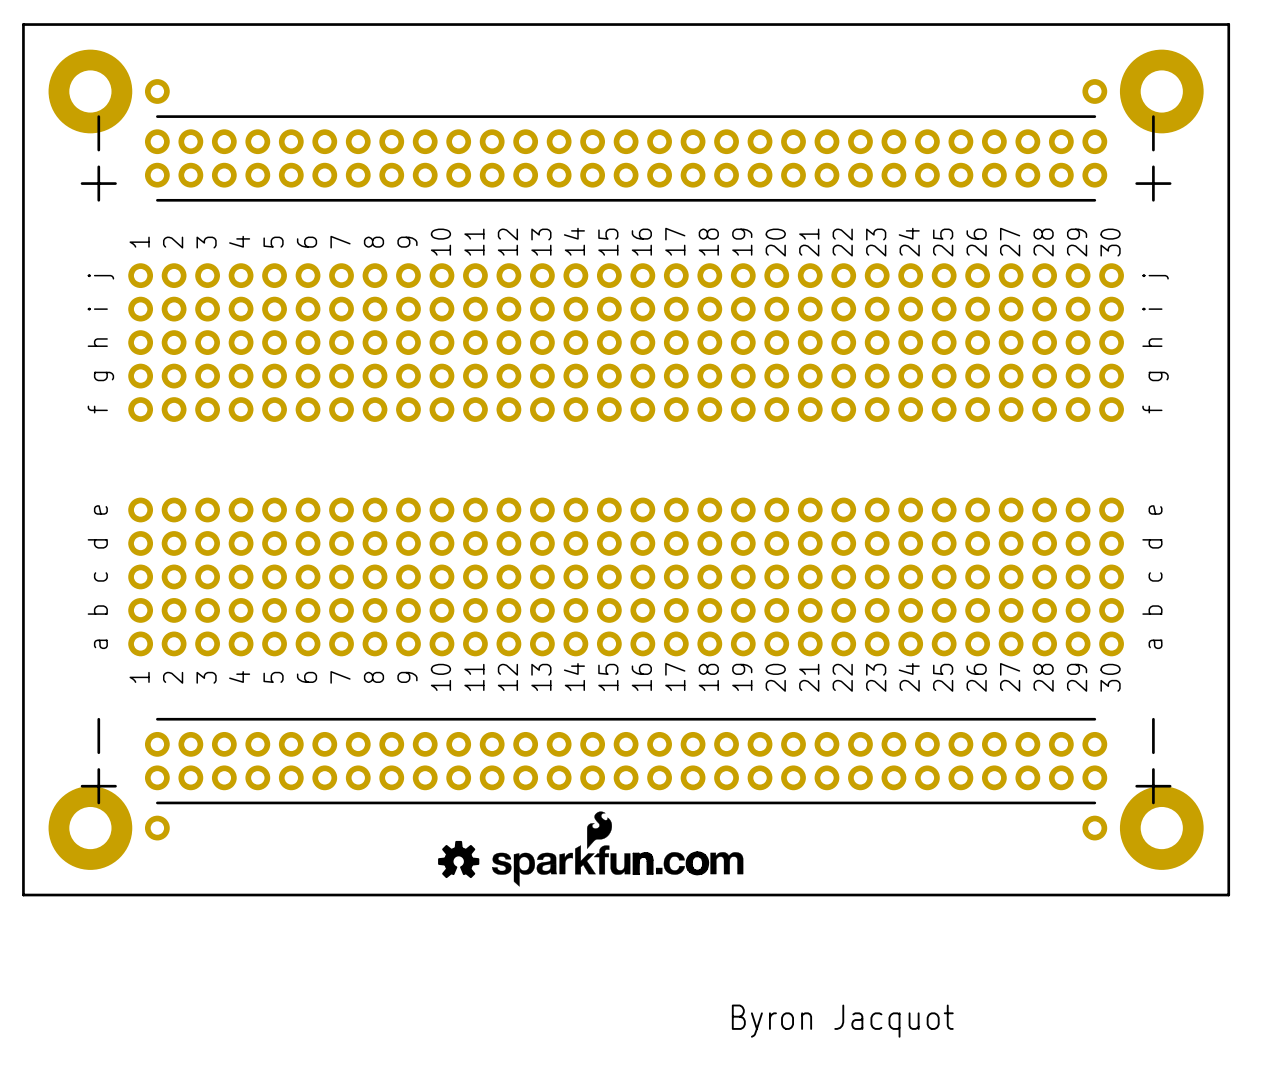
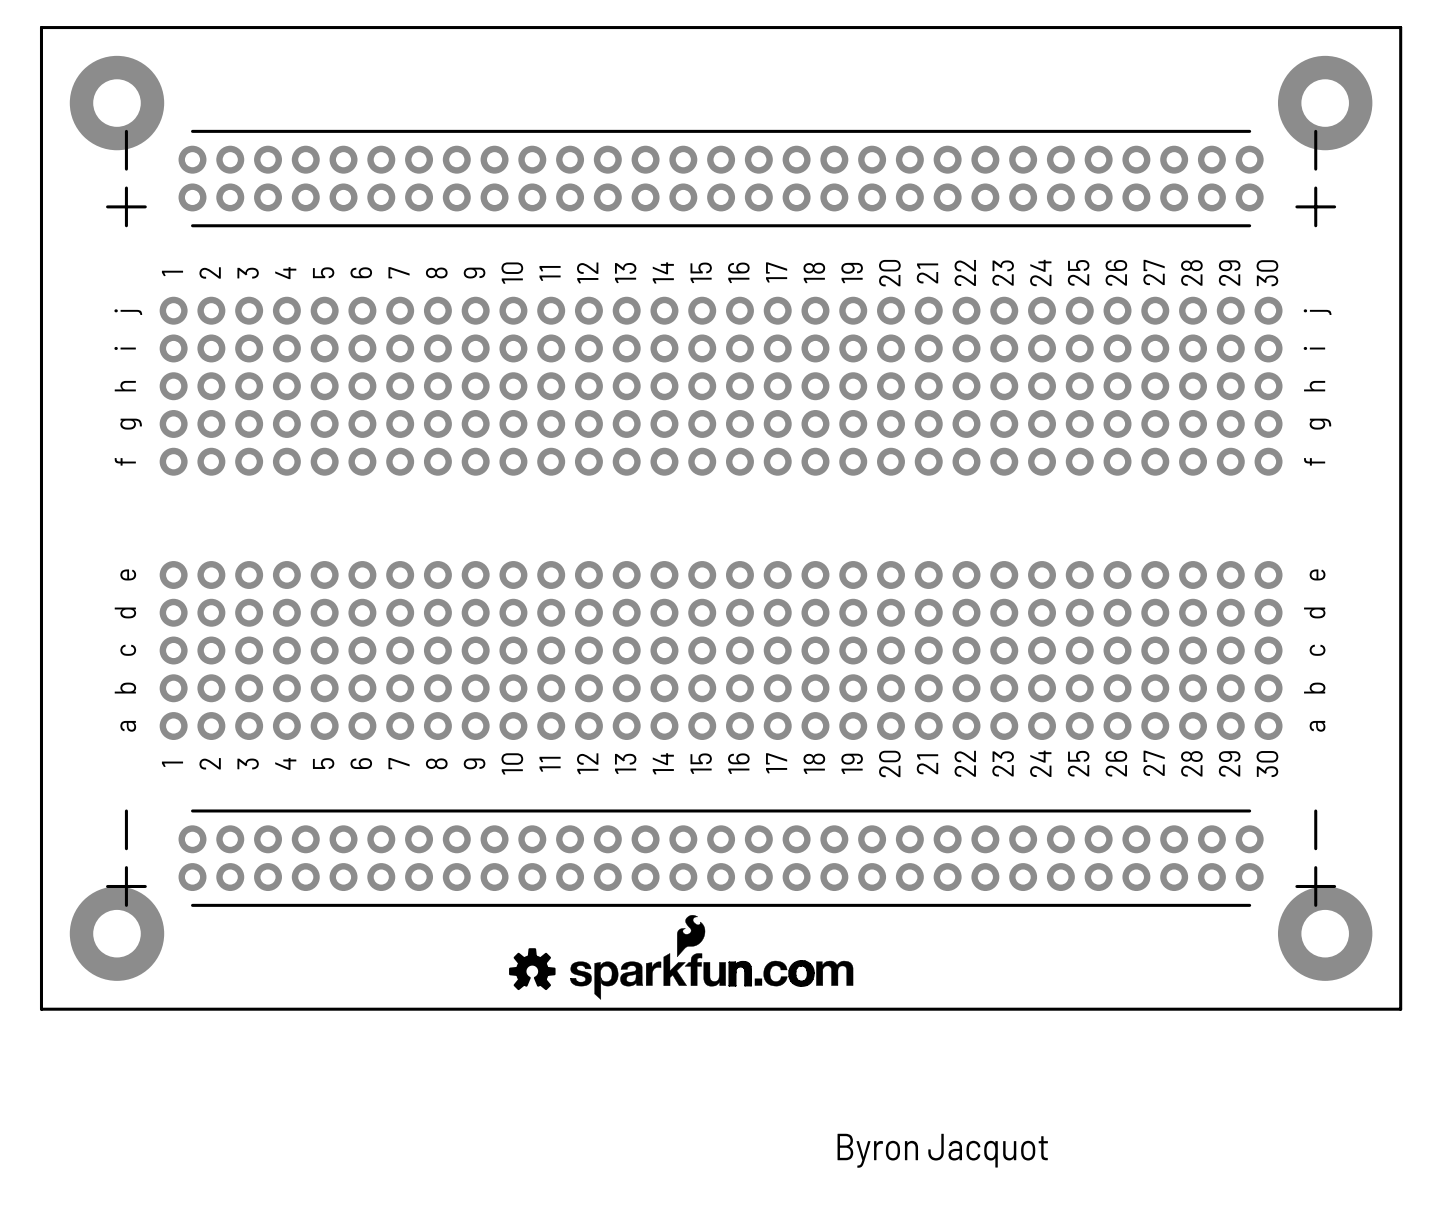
part: (157, 91) -> none
part: (1094, 91) -> none
part: (157, 828) -> none
part: (1094, 828) -> none

